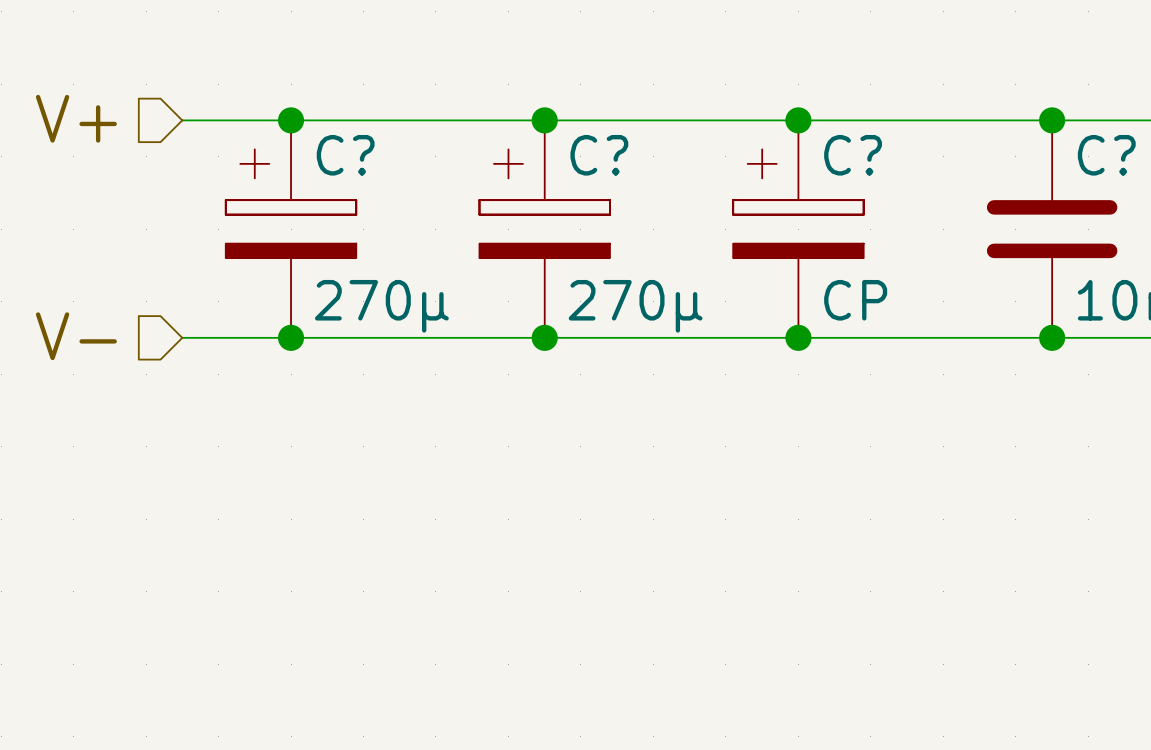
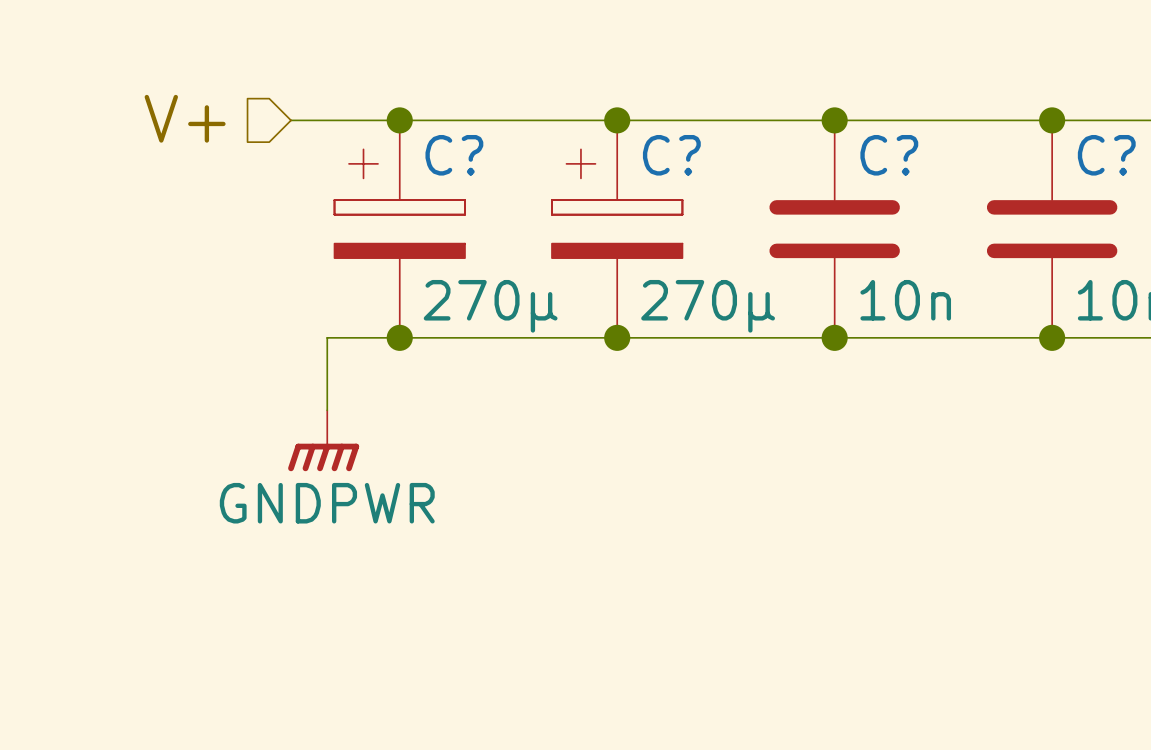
hierarchical label position: V+ (76, 118) -> V+ (185, 118)
wire: (182, 120) (291, 120) -> none
junction: (291, 120) -> none
junction: none -> (399, 120)
junction: (544, 120) -> none
junction: none -> (617, 120)
junction position: (798, 120) -> (834, 120)
C?: 270µ (291, 229) -> none
C?: none -> 270µ (399, 229)
C?: 270µ (544, 229) -> none
C?: none -> 270µ (617, 229)
C?: CP (798, 229) -> none
C?: none -> 10n (834, 229)
hierarchical label: V- (76, 336) -> none
wire: (182, 337) (327, 337) -> (327, 410) (327, 337)
junction: (291, 337) -> none
junction: none -> (399, 337)
junction: (544, 337) -> none
junction: none -> (617, 337)
junction position: (798, 337) -> (834, 337)
power symbol: none -> GNDPWR (323, 440)

